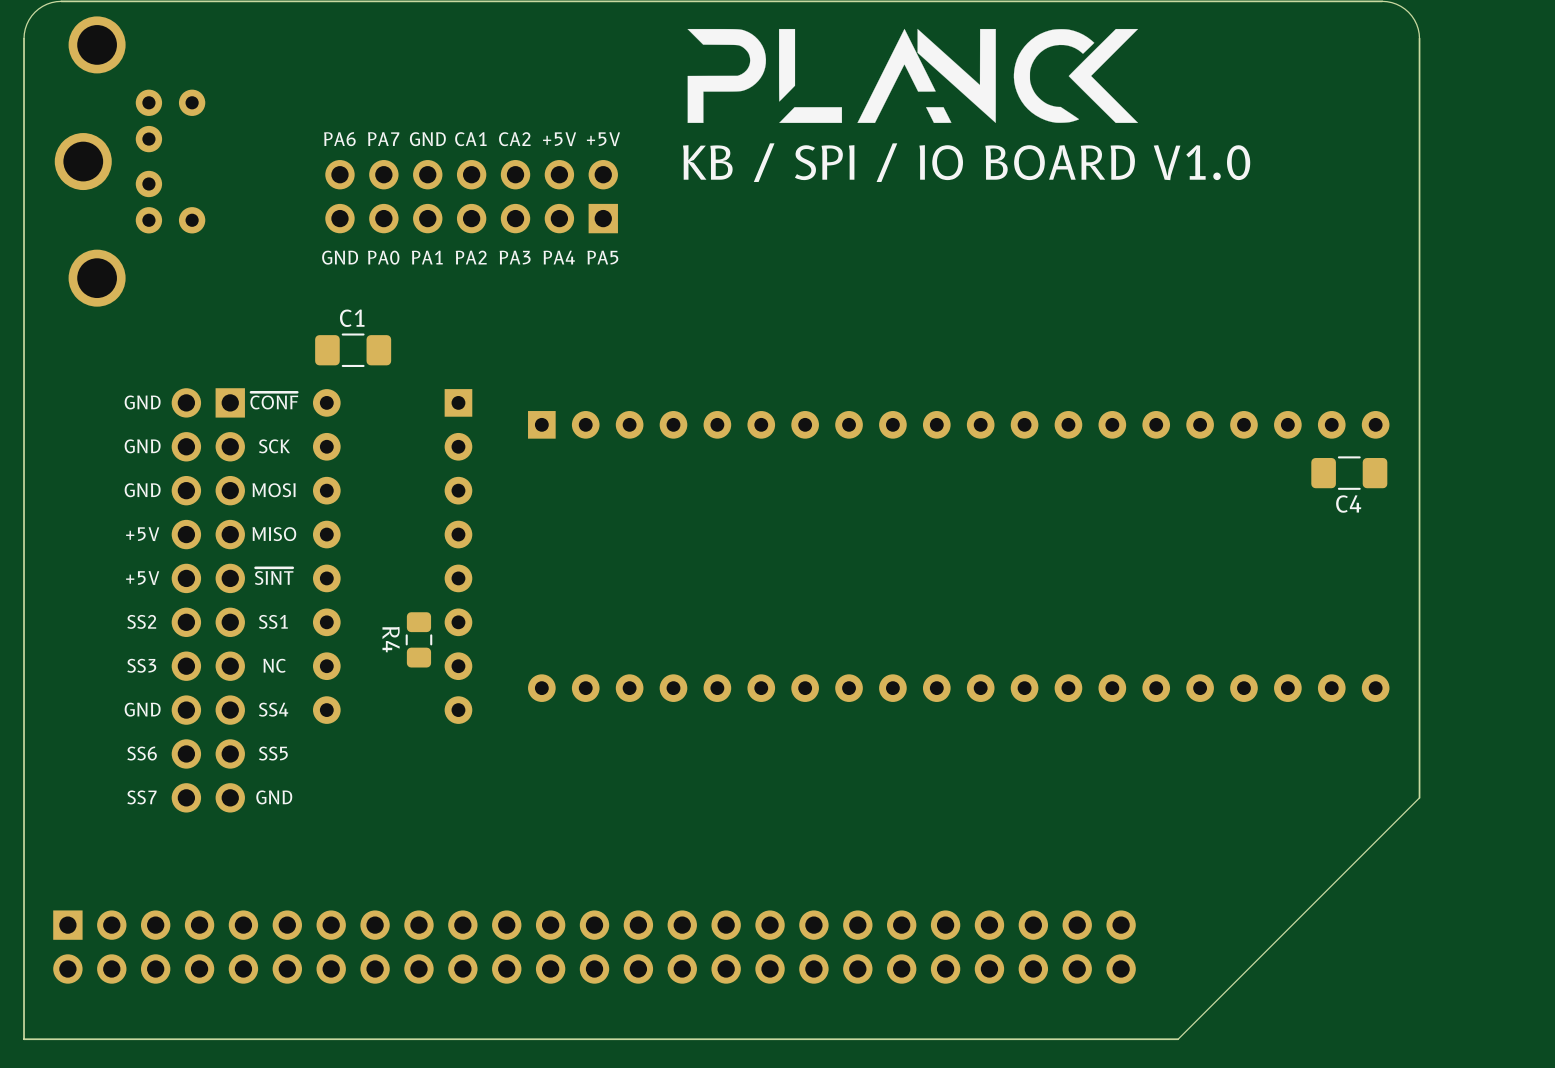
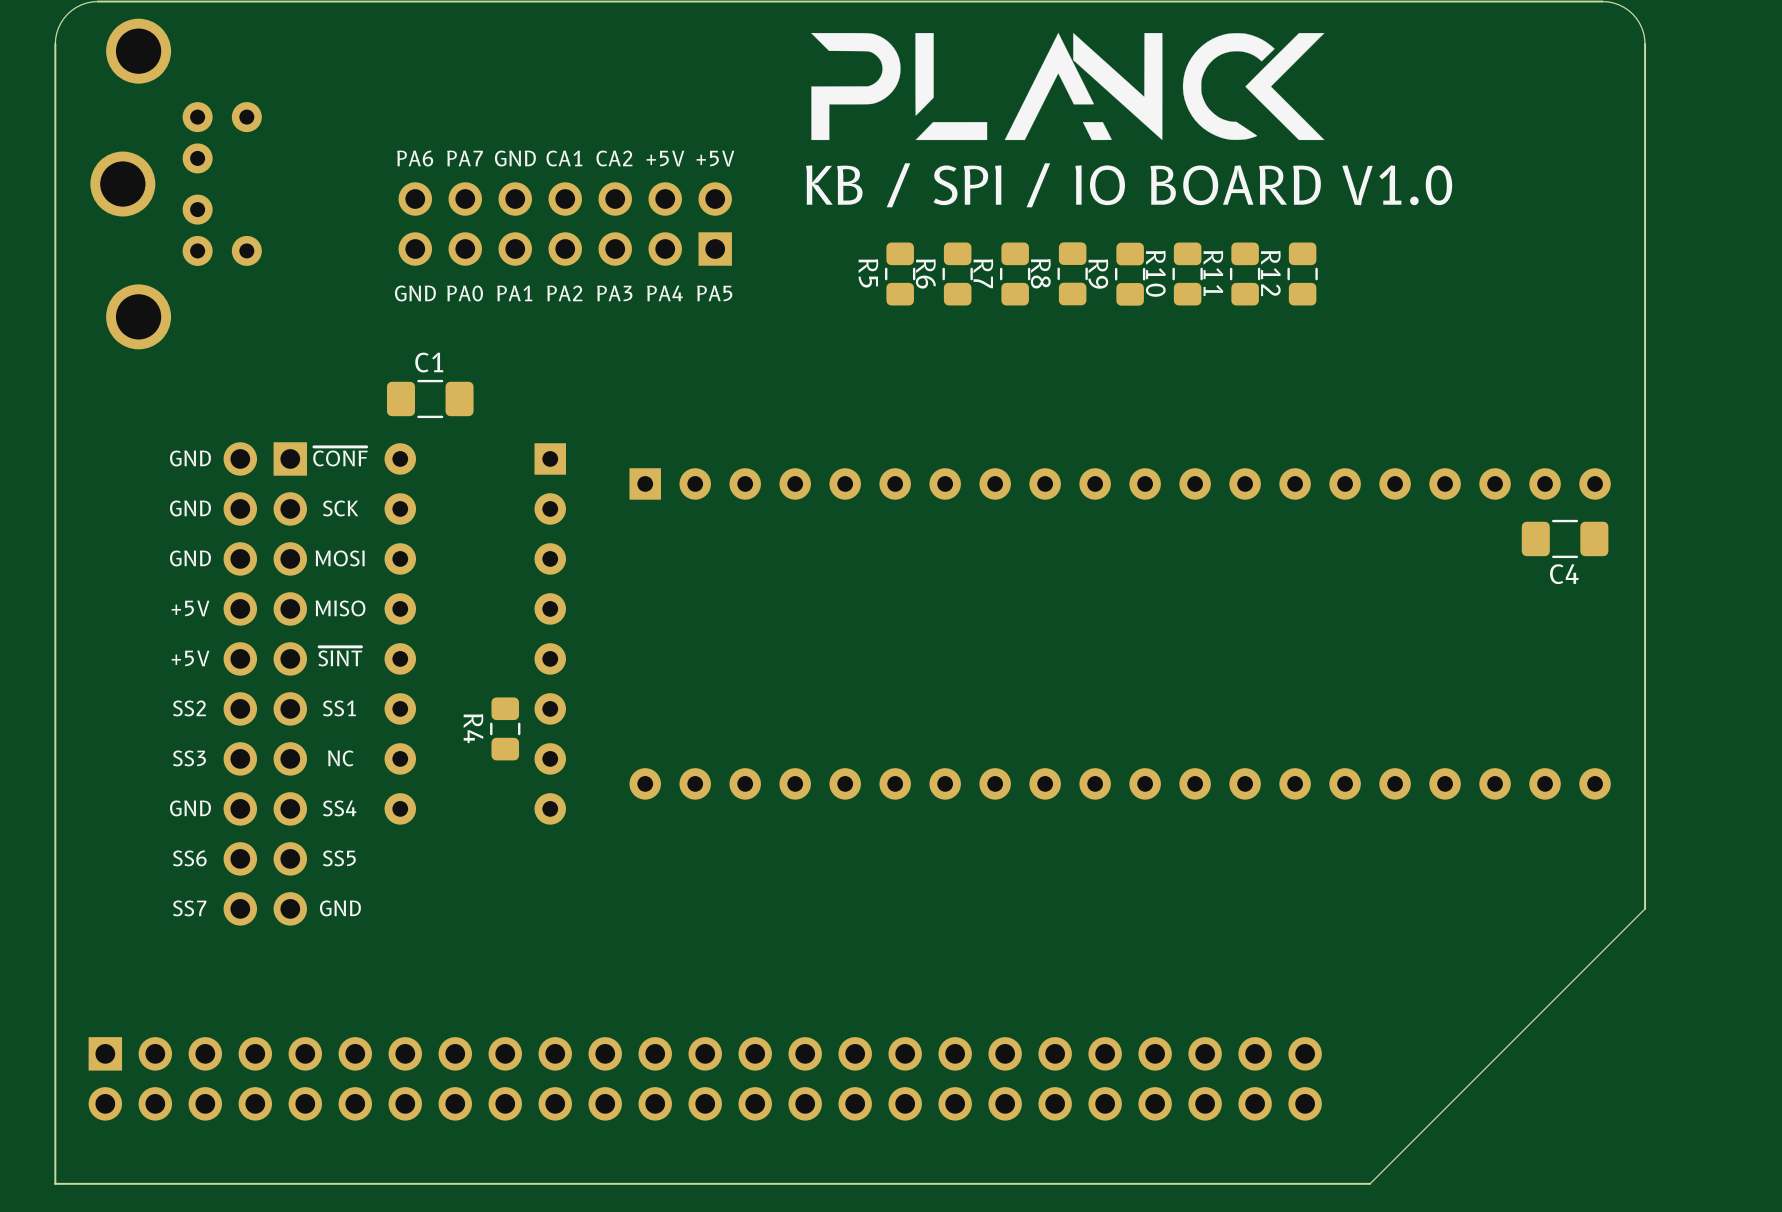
R5: none -> (900, 274)
R6: none -> (957, 274)
R7: none -> (1015, 274)
R8: none -> (1072, 273)
R9: none -> (1130, 274)
R10: none -> (1187, 274)
R11: none -> (1245, 274)
R12: none -> (1302, 274)

